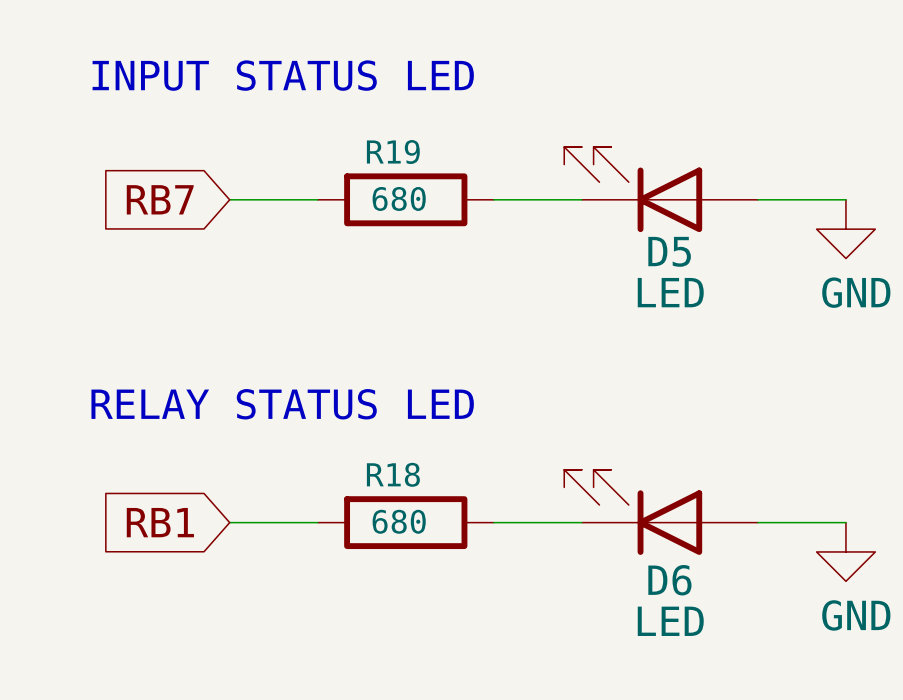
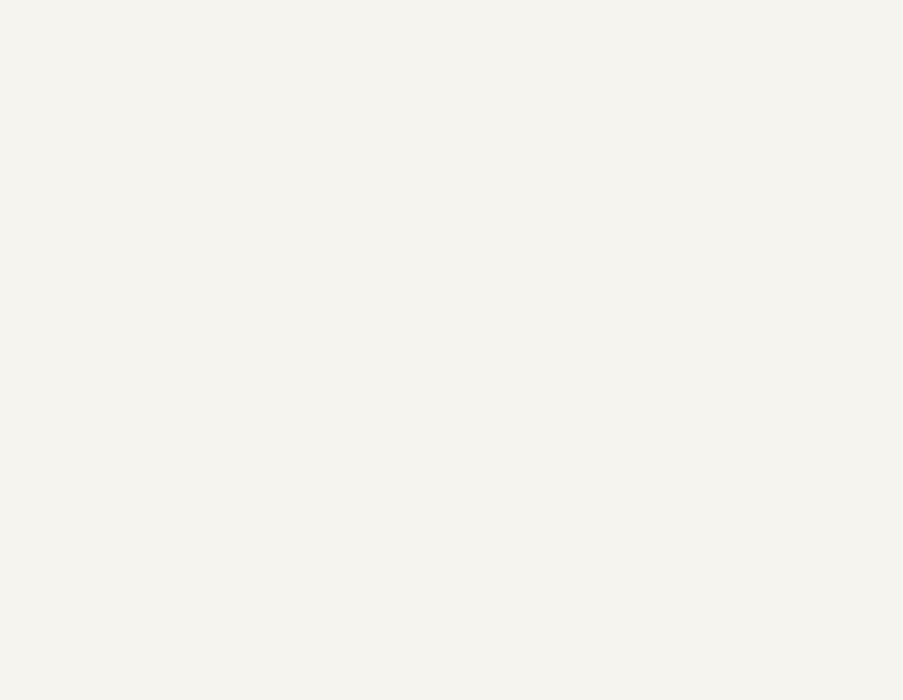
text: INPUT STATUS LED (283, 75) -> none
D5: LED (661, 189) -> none
global label: RB7 (160, 199) -> none
wire: (229, 199) (317, 199) -> none
R19: 680 (405, 199) -> none
wire: (493, 199) (581, 199) -> none
wire: (757, 199) (845, 199) -> none
power symbol: GND (845, 229) -> none
text: RELAY STATUS LED (282, 404) -> none
D6: LED (661, 512) -> none
global label: RB1 (160, 522) -> none
wire: (229, 522) (317, 522) -> none
R18: 680 (405, 522) -> none
wire: (493, 522) (581, 522) -> none
wire: (757, 522) (845, 522) -> none
power symbol: GND (845, 551) -> none

